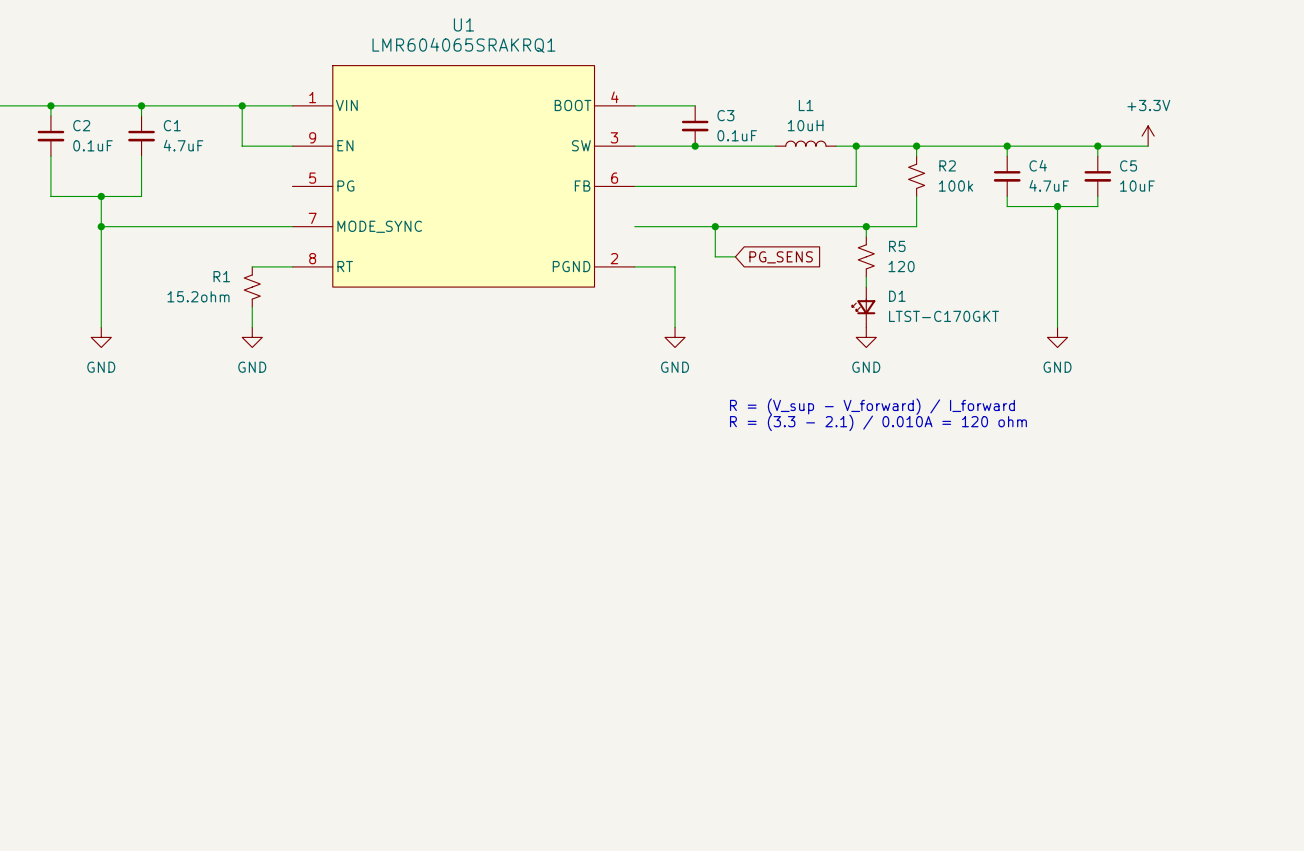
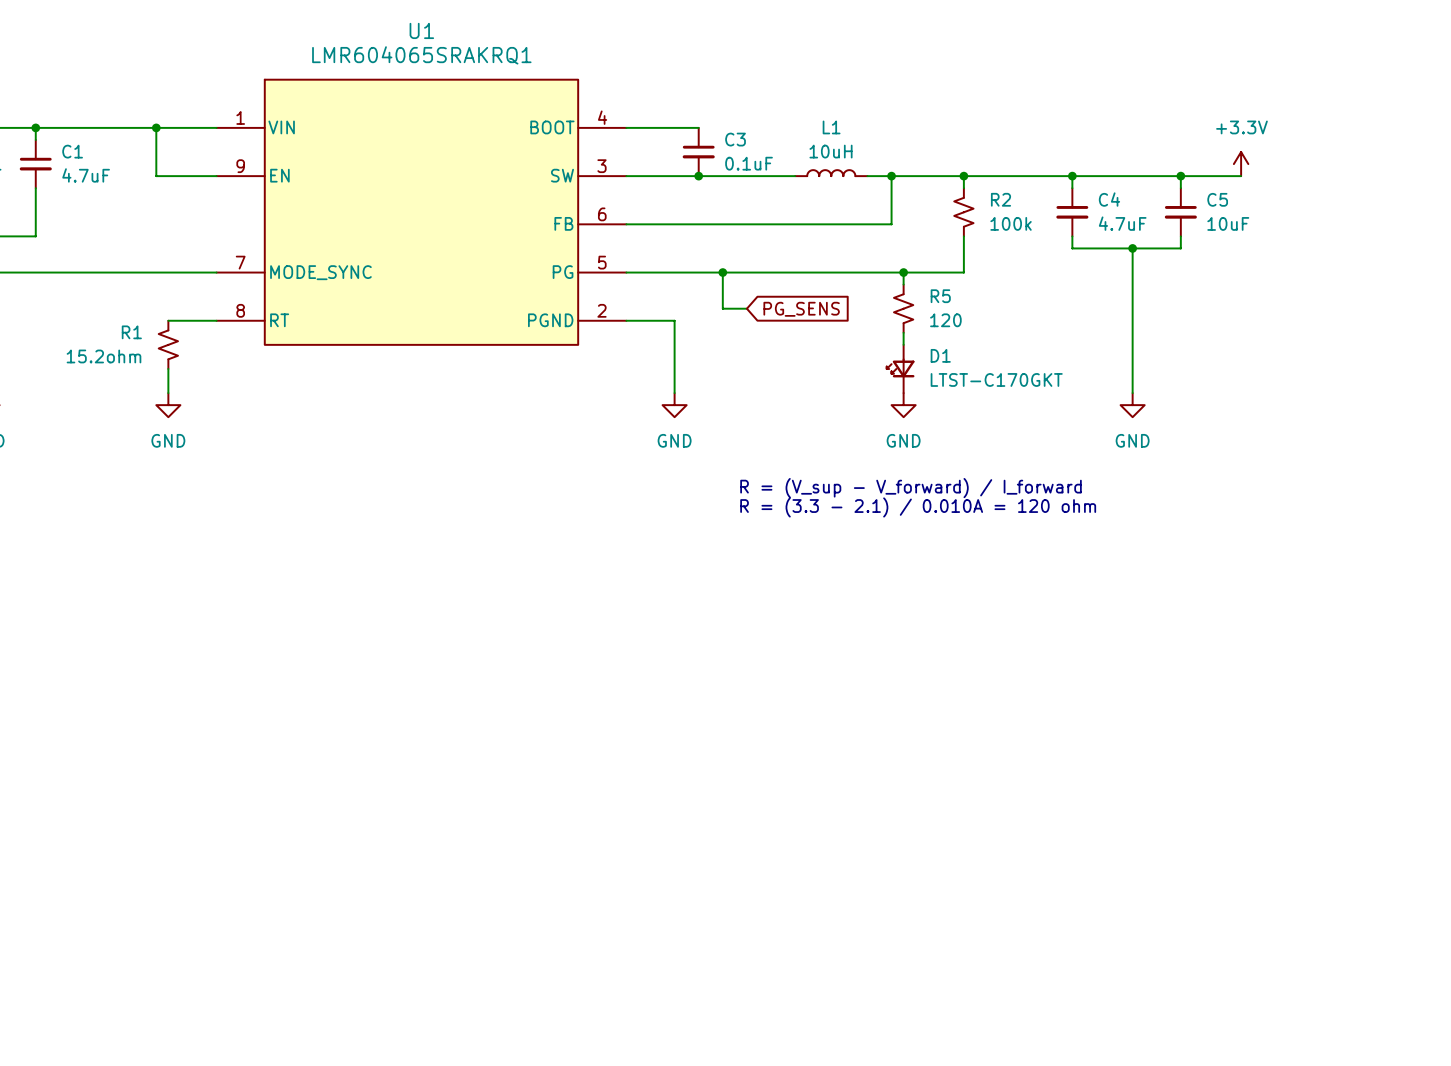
U1 symbol: [292, 65, 635, 288] -> [216, 79, 627, 345]

